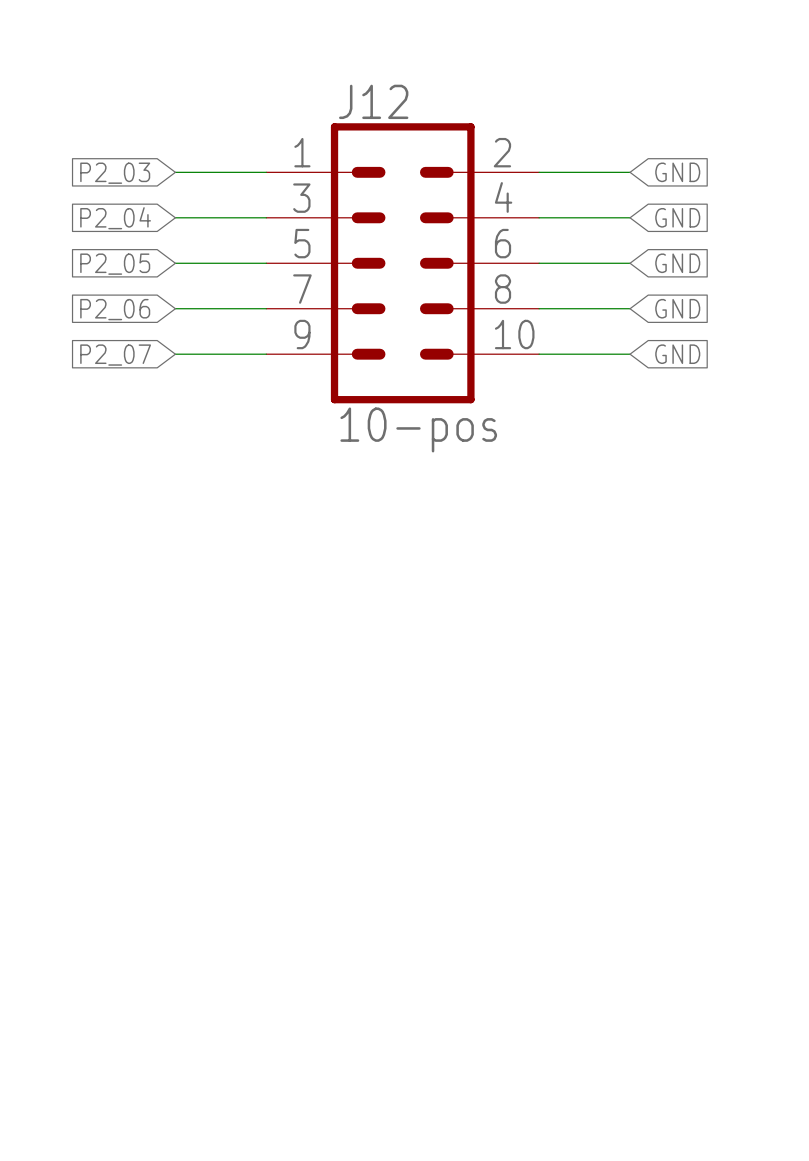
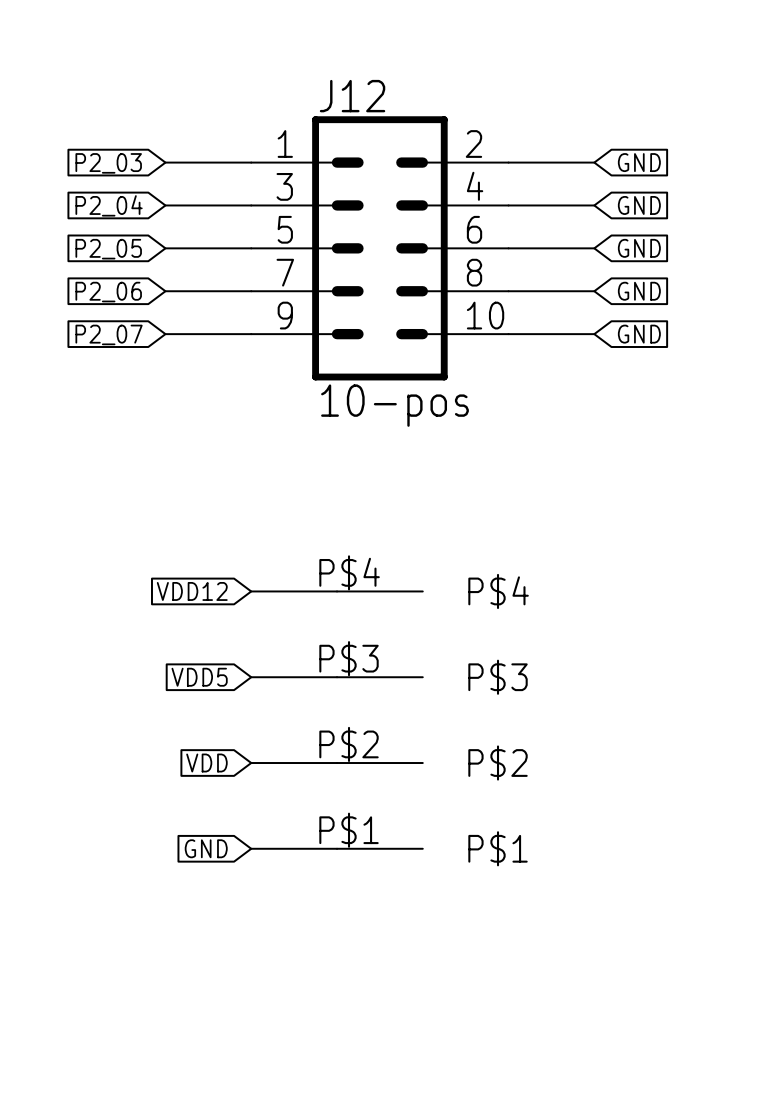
global label: none -> VDD12 (192, 591)
wire: none -> (251, 591) (337, 591)
global label: none -> VDD5 (199, 677)
wire: none -> (251, 677) (337, 677)
part: none -> (379, 720)
global label: none -> VDD (206, 763)
wire: none -> (251, 763) (337, 763)
global label: none -> GND (206, 848)
wire: none -> (251, 848) (337, 848)

